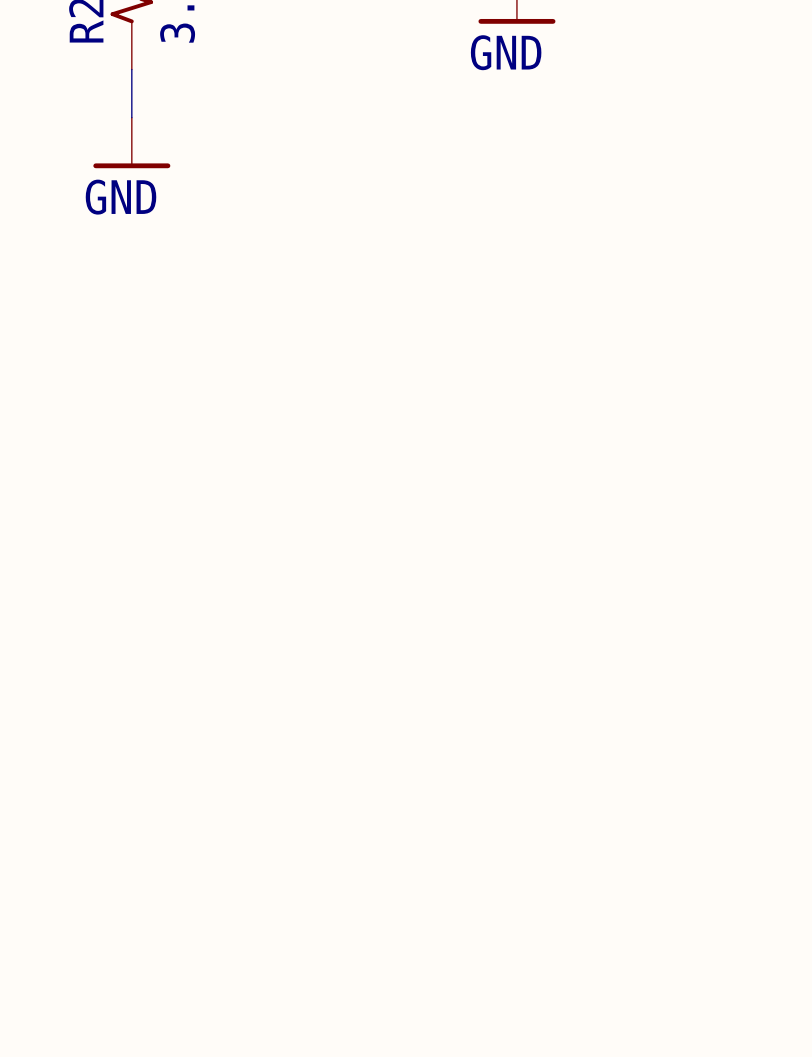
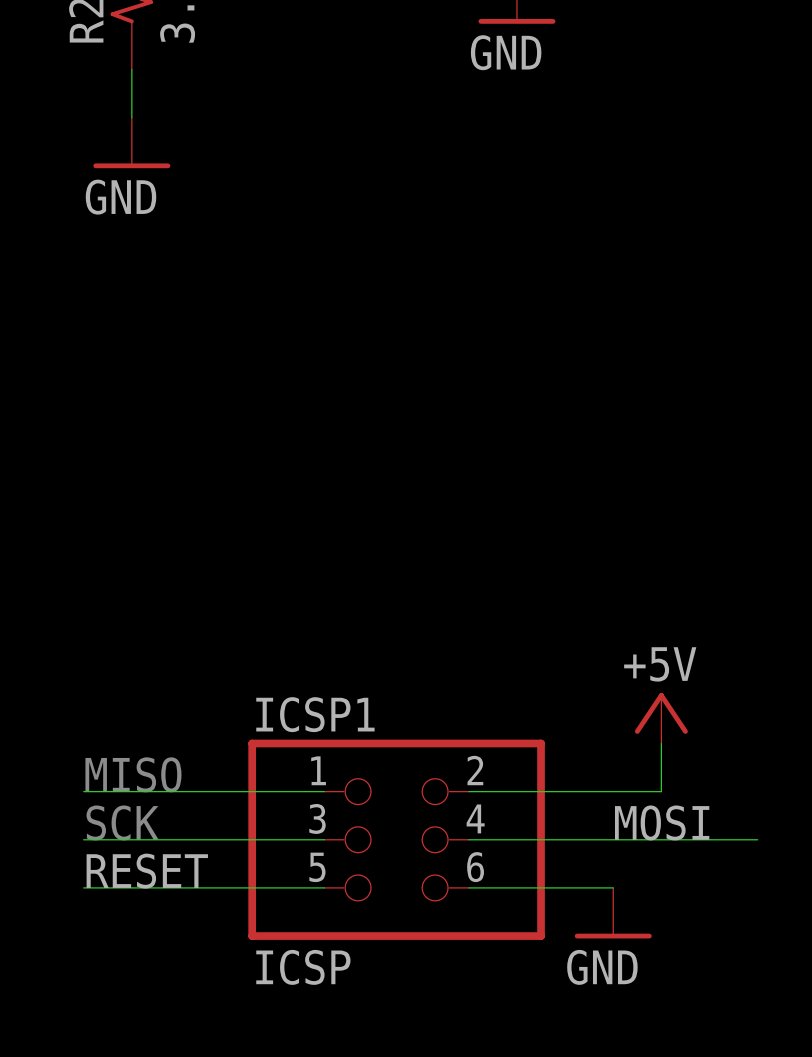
power symbol: none -> +5V (661, 718)
wire: none -> (661, 743) (661, 791) (468, 791)
text: none -> MISO (133, 774)
wire: none -> (83, 791) (324, 791)
text: none -> SCK (122, 822)
label: none -> MOSI (662, 822)
wire: none -> (83, 839) (324, 839)
ICSP1: none -> ICSP (396, 839)
wire: none -> (468, 839) (757, 839)
label: none -> RESET (147, 871)
wire: none -> (83, 887) (324, 887)
wire: none -> (468, 887) (613, 887)
power symbol: none -> GND (613, 913)

